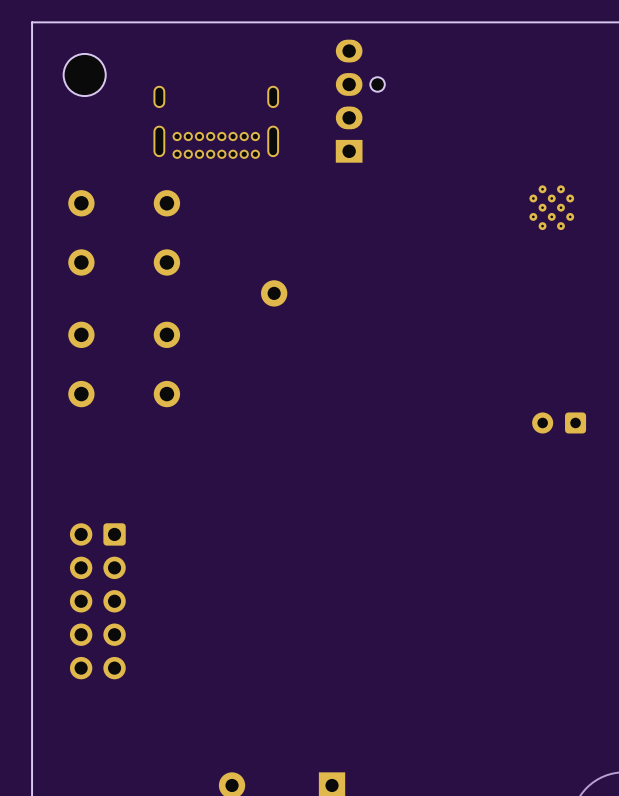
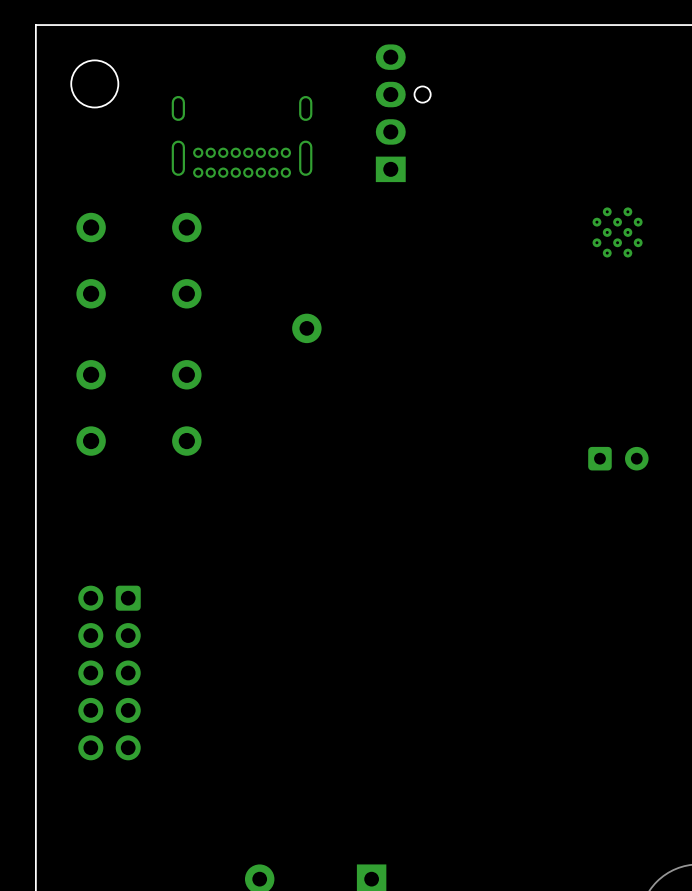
part rotation: 0° (559, 422) -> 180° (618, 458)

